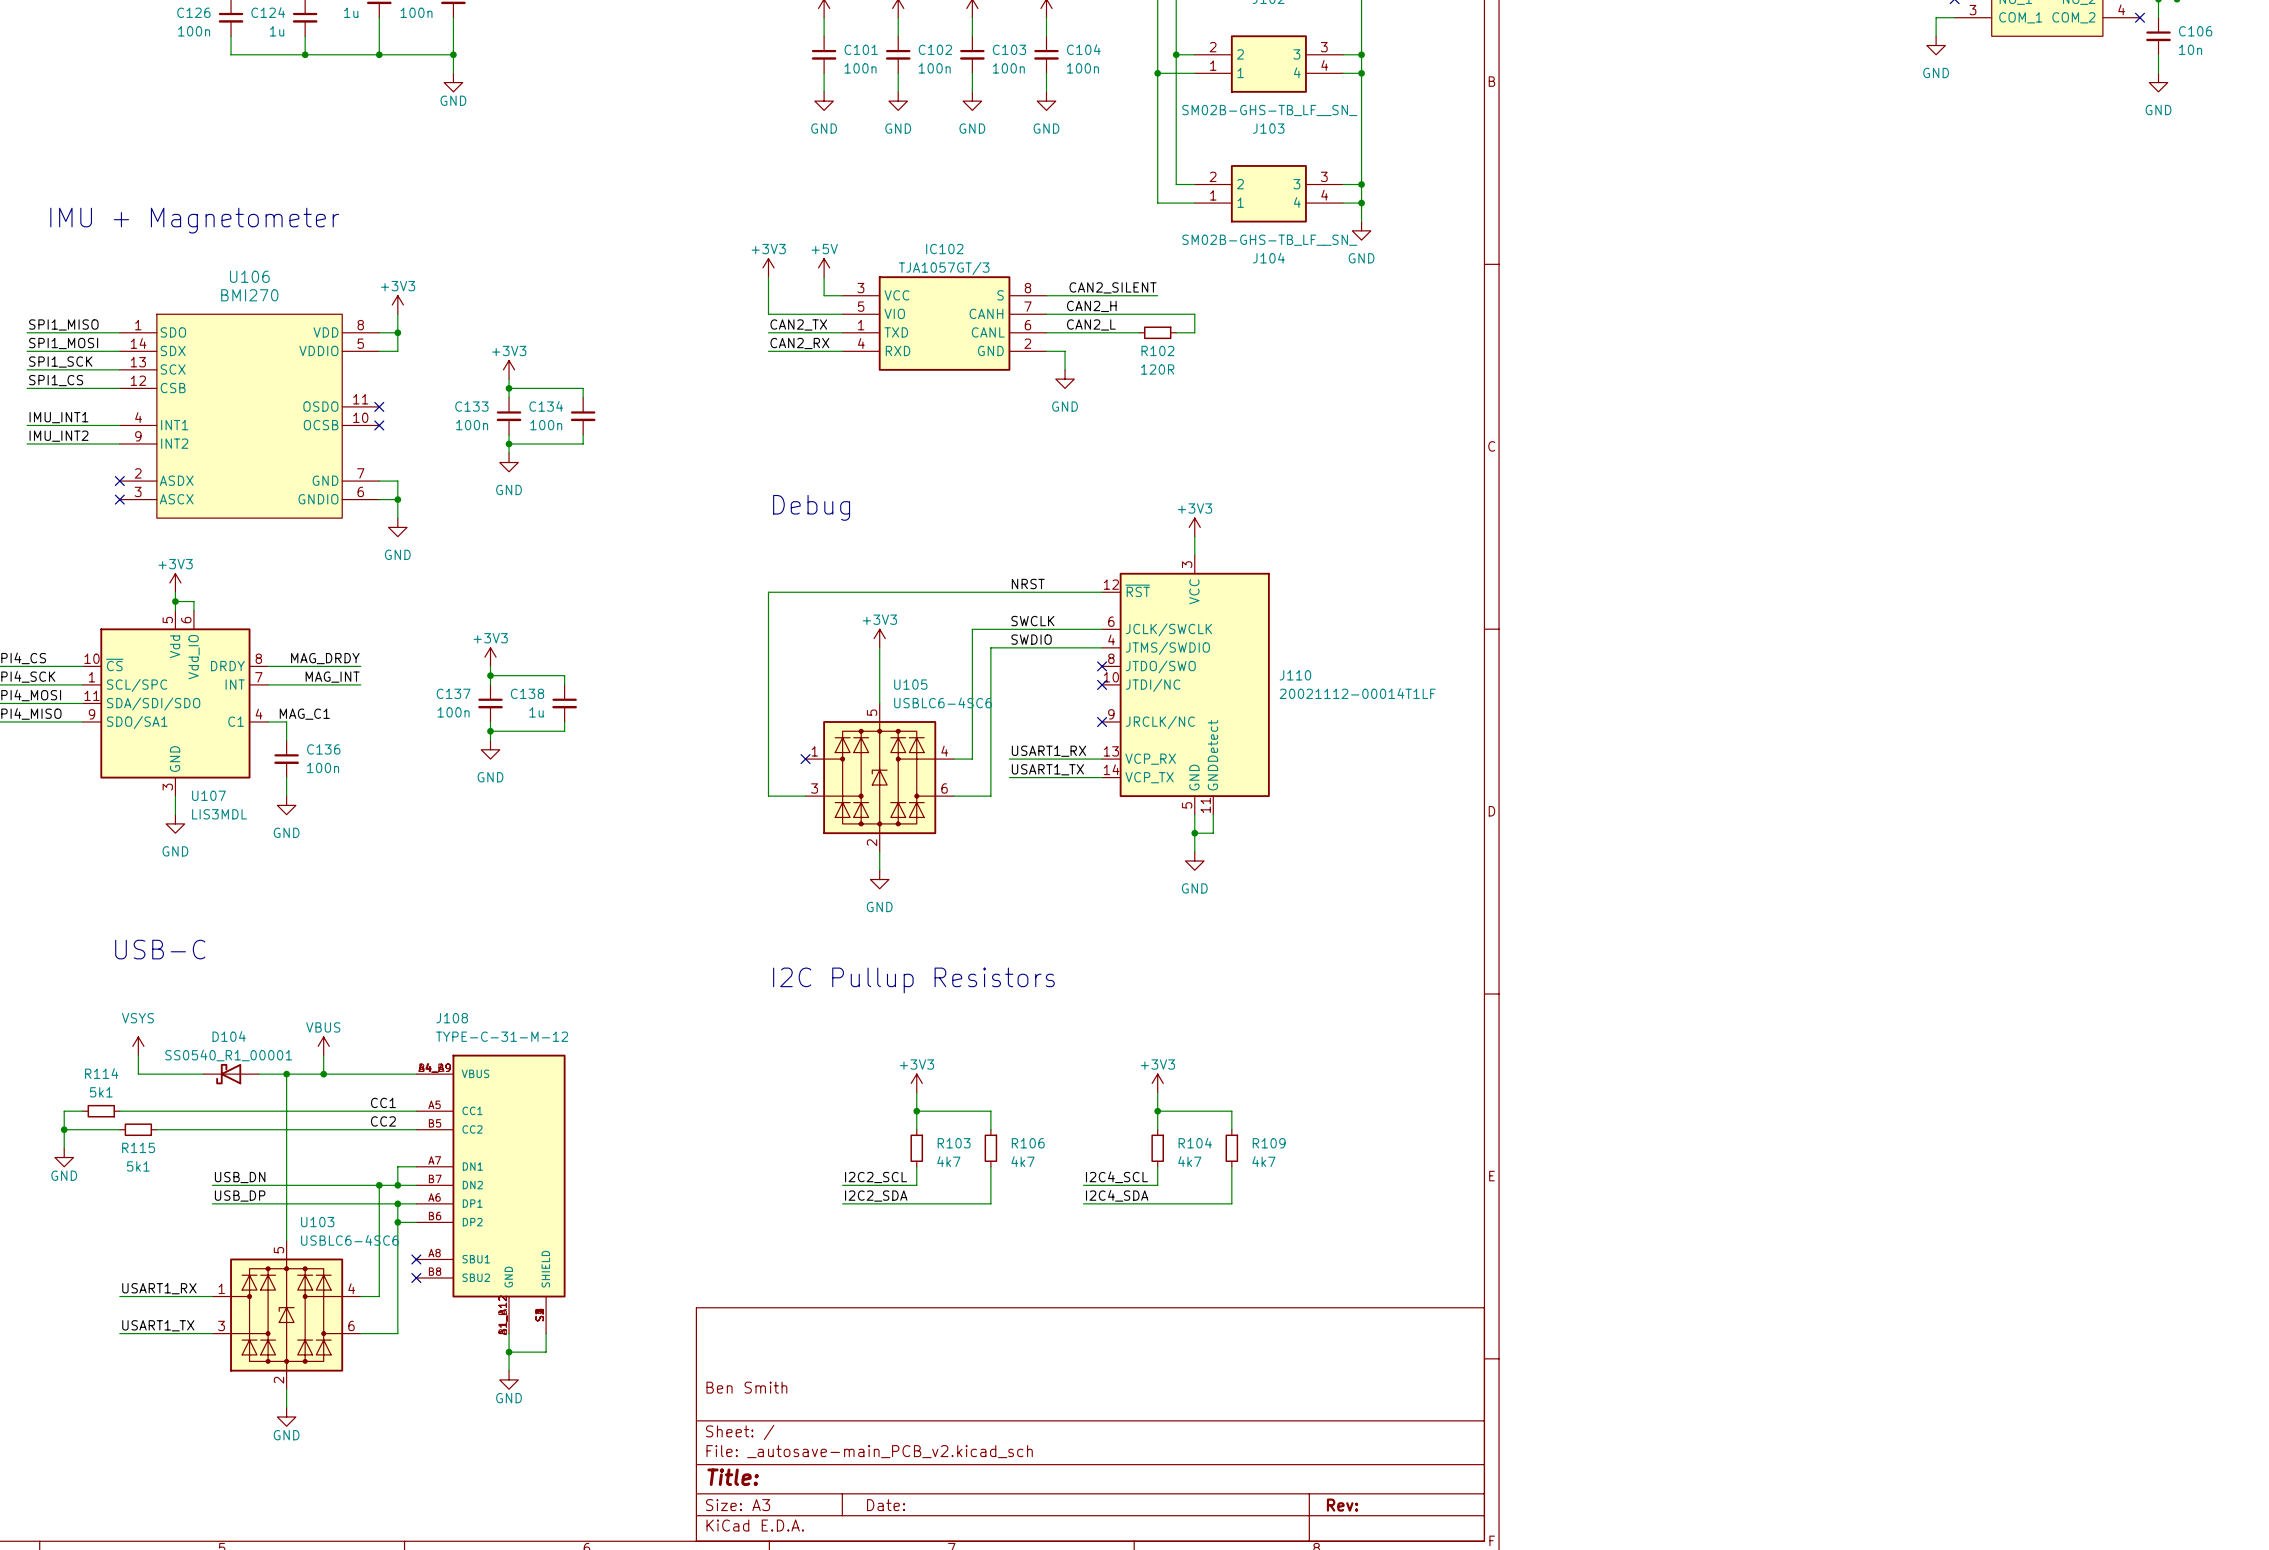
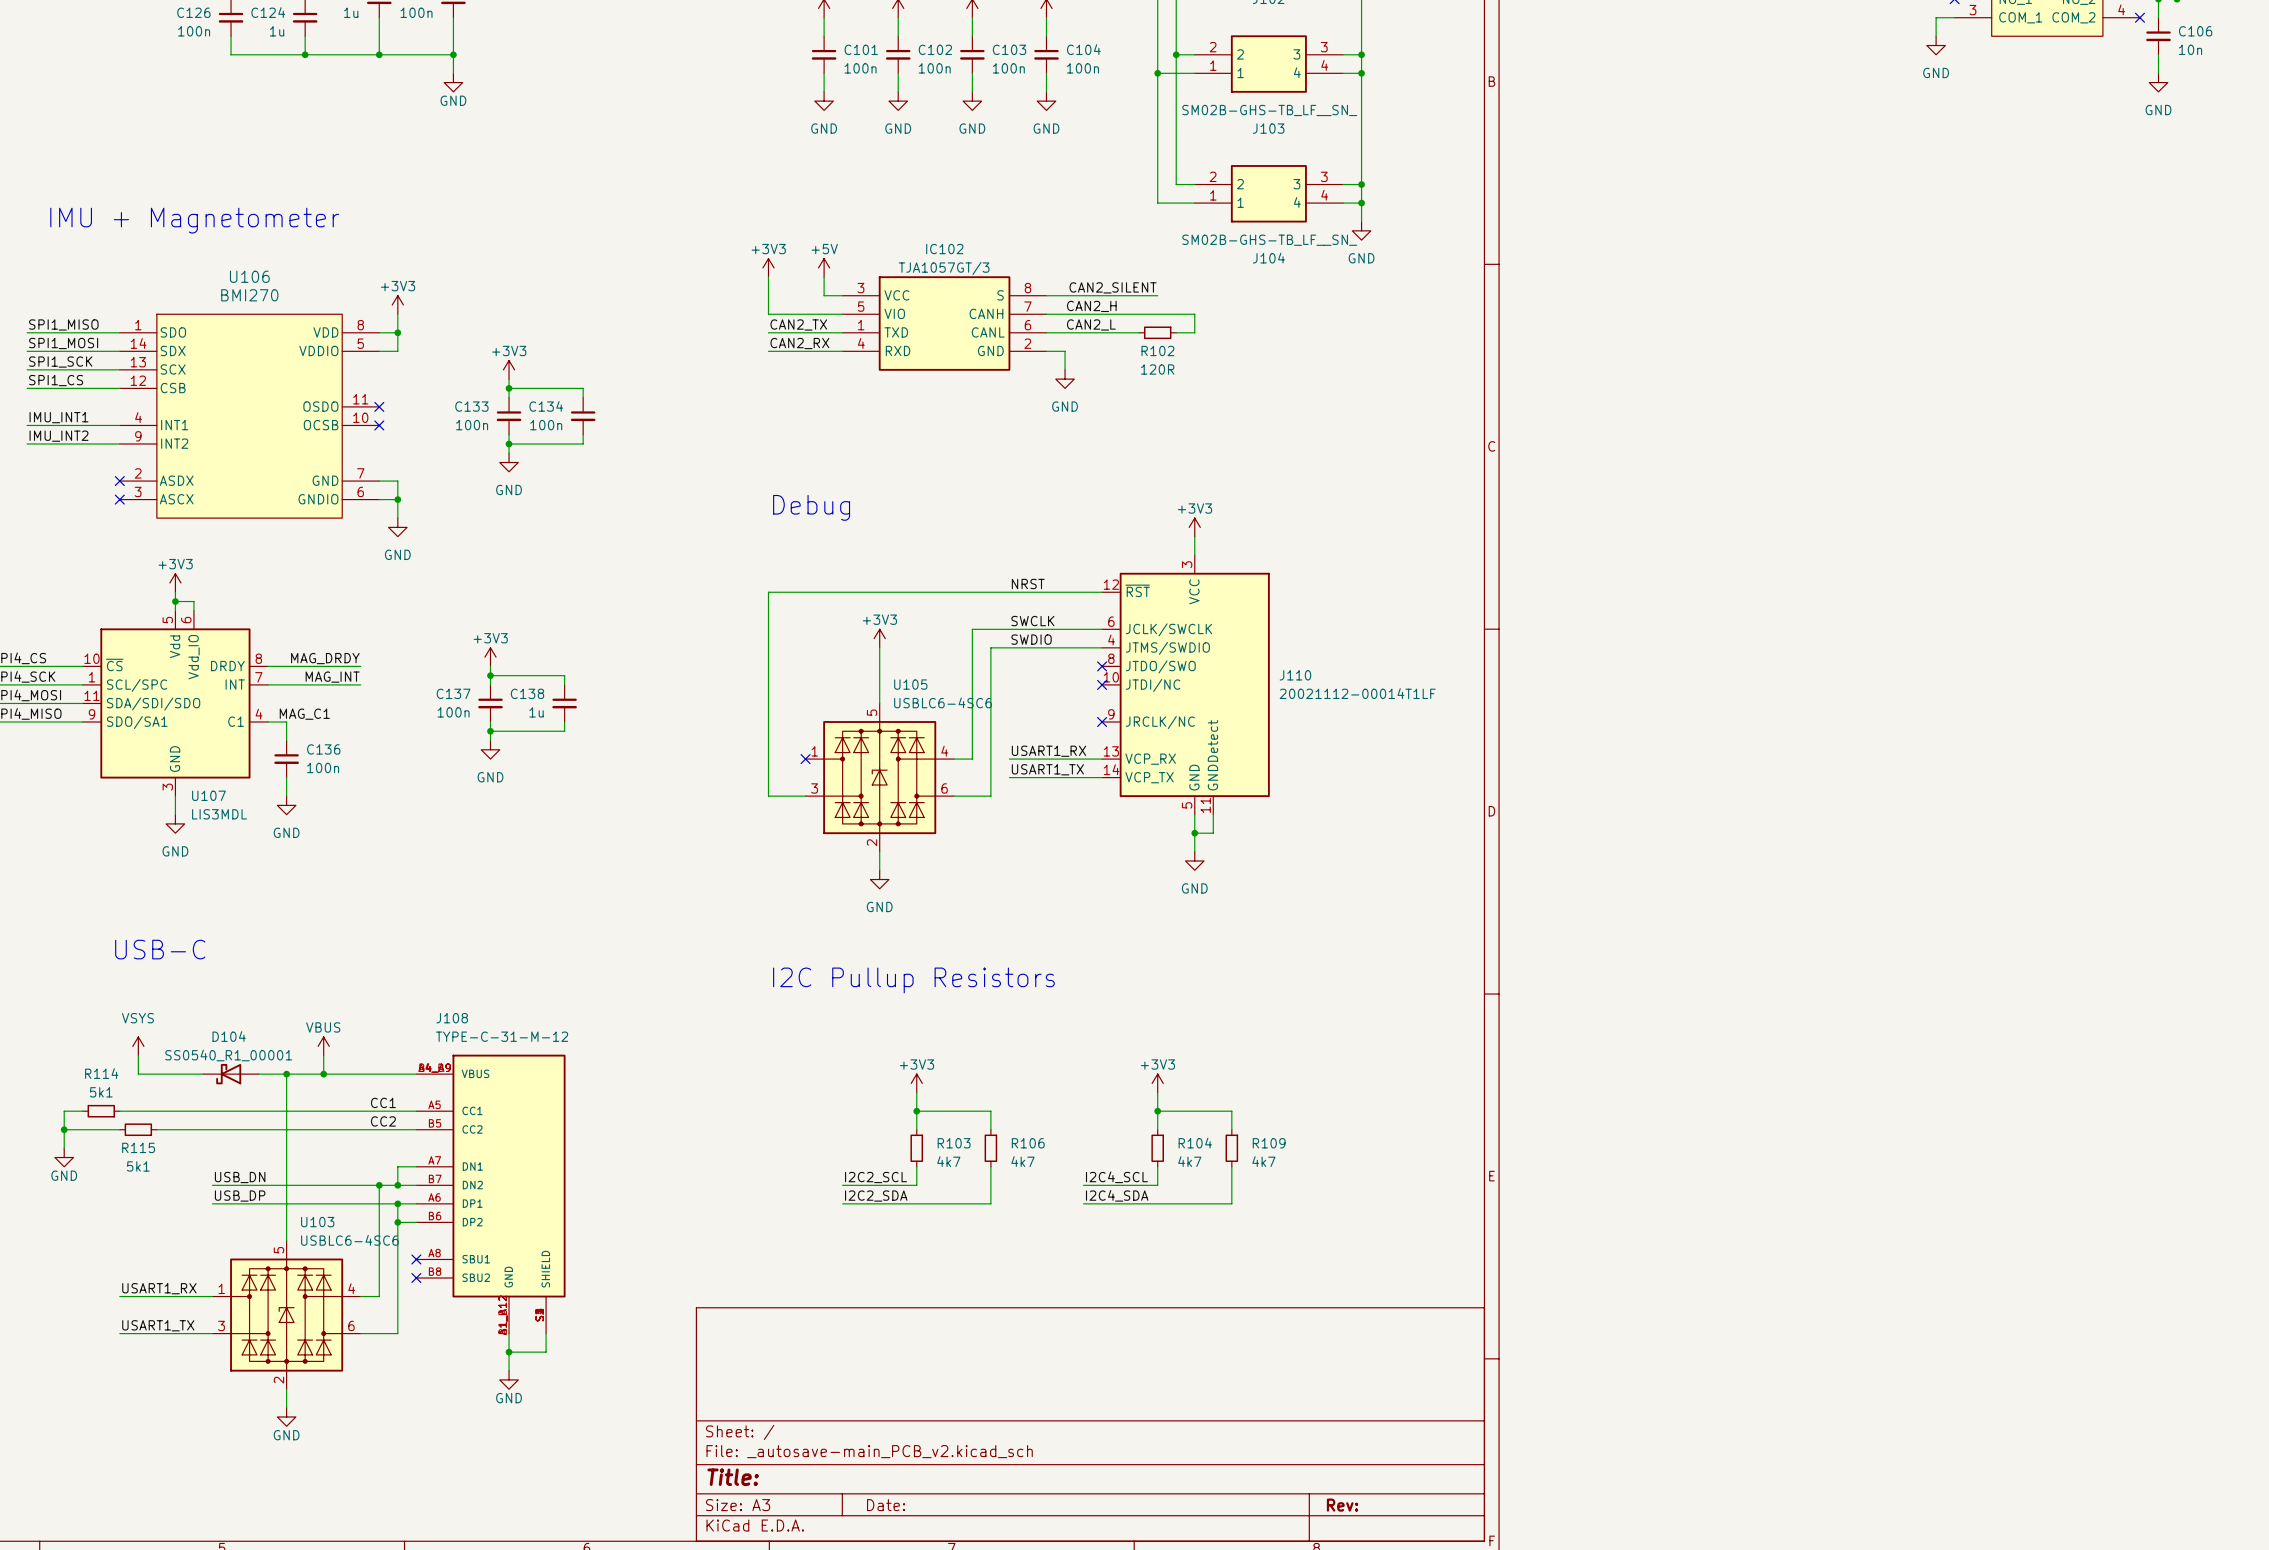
title block: Ben Smith (746, 1387) -> none

